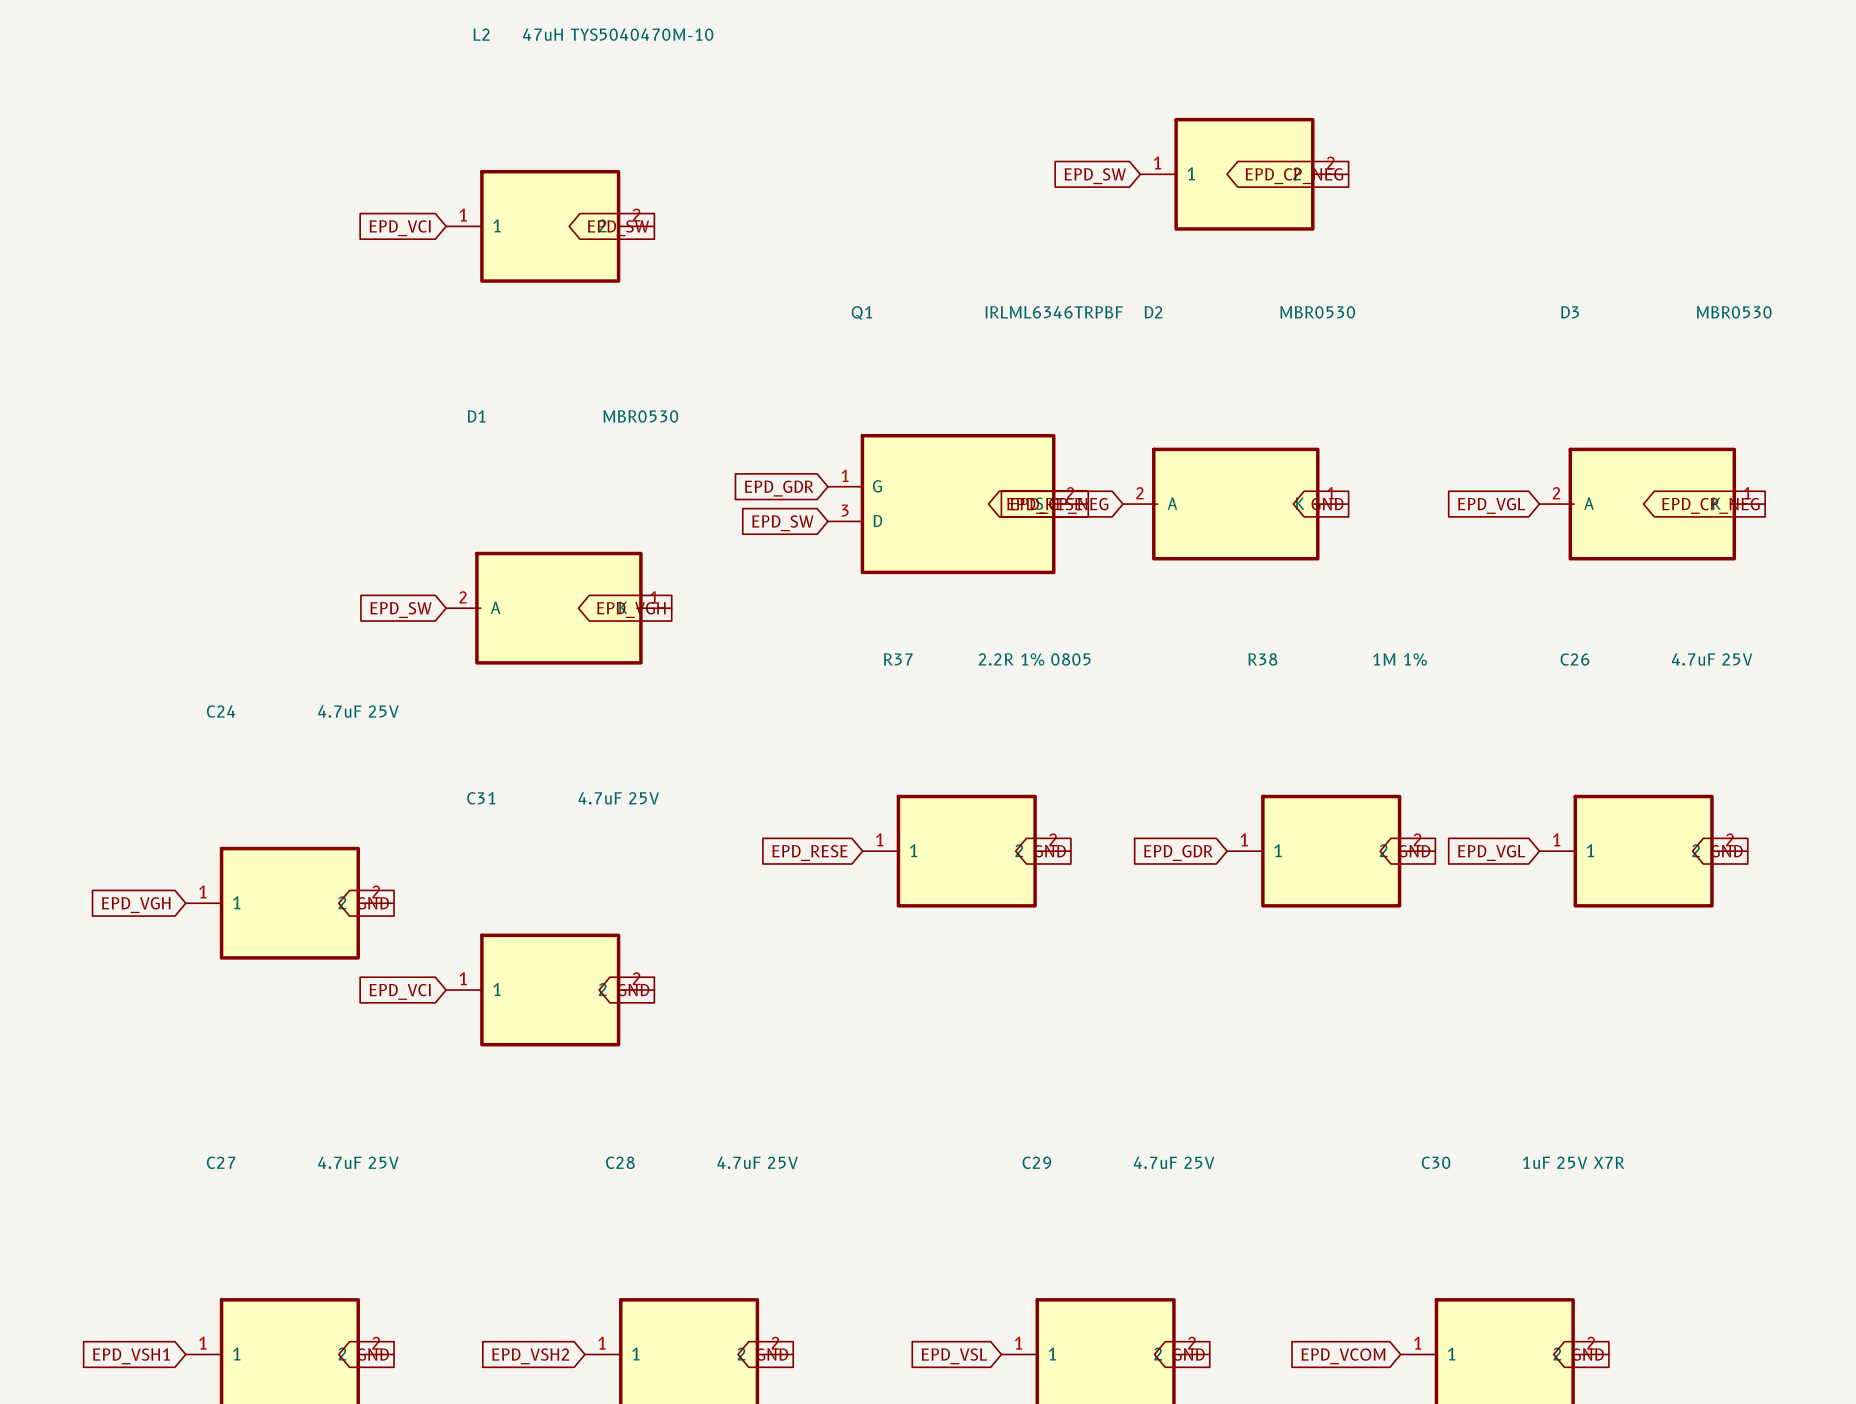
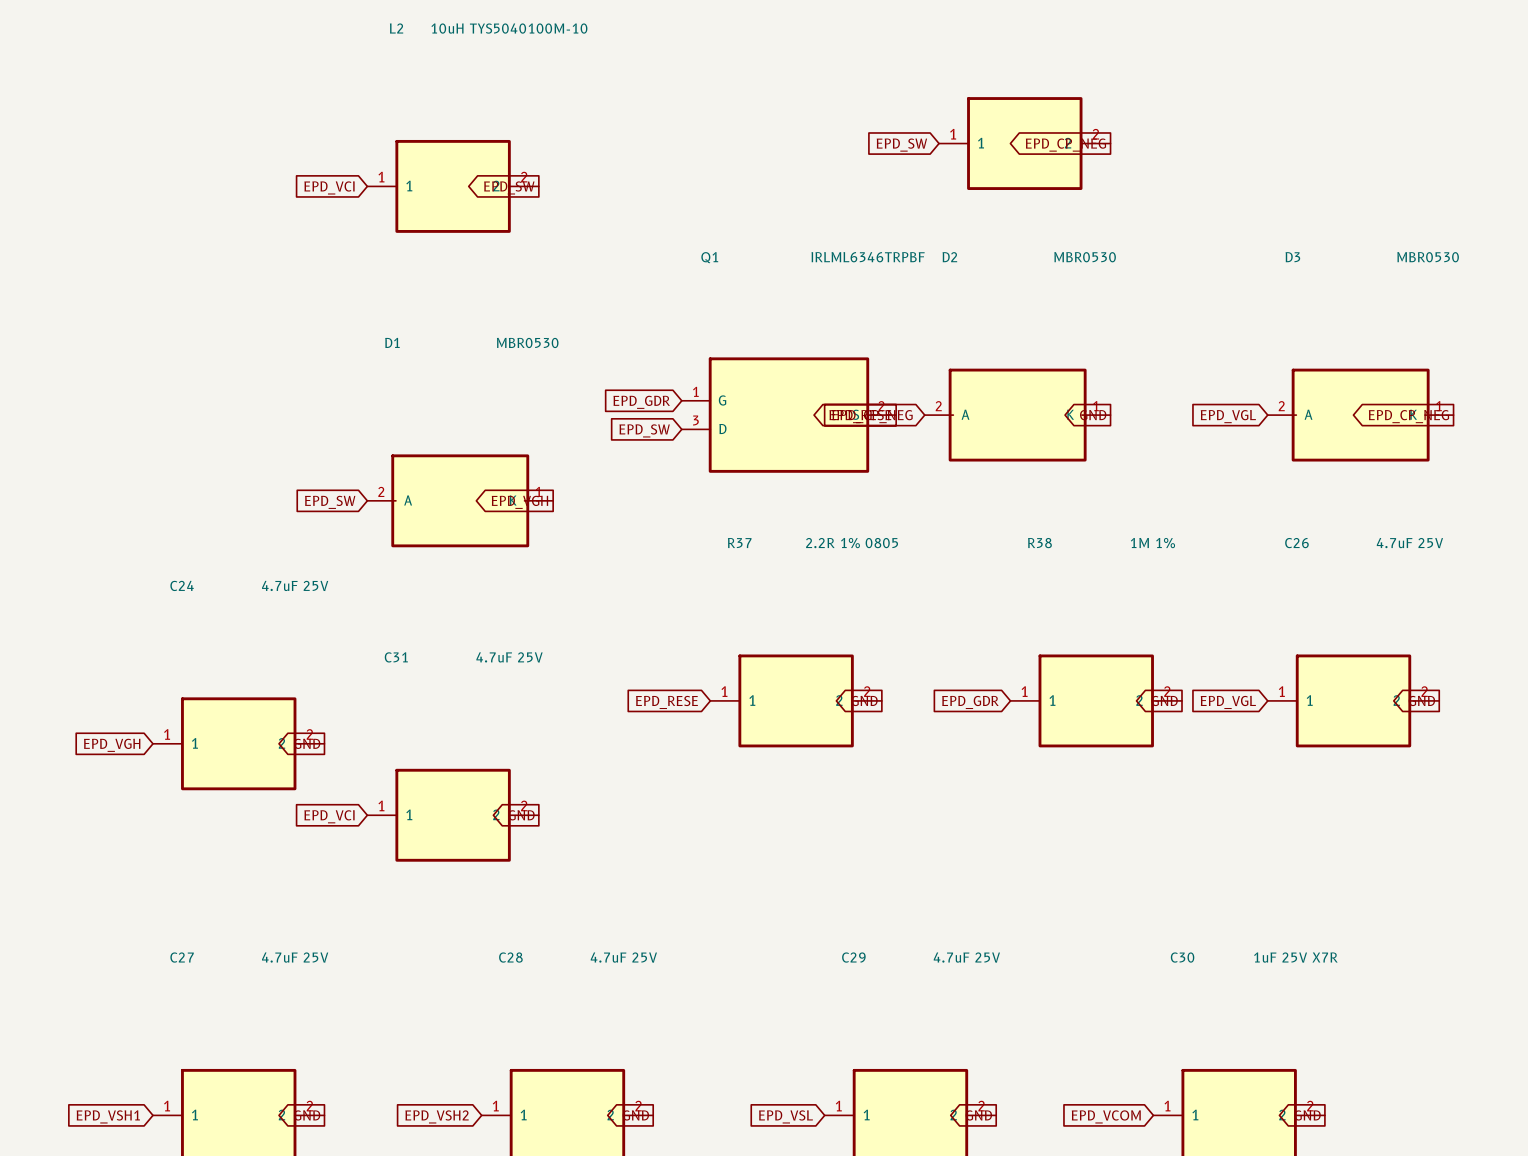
L2 value: 47uH TYS5040470M-10 (618, 34) -> 10uH TYS5040100M-10 (509, 28)

